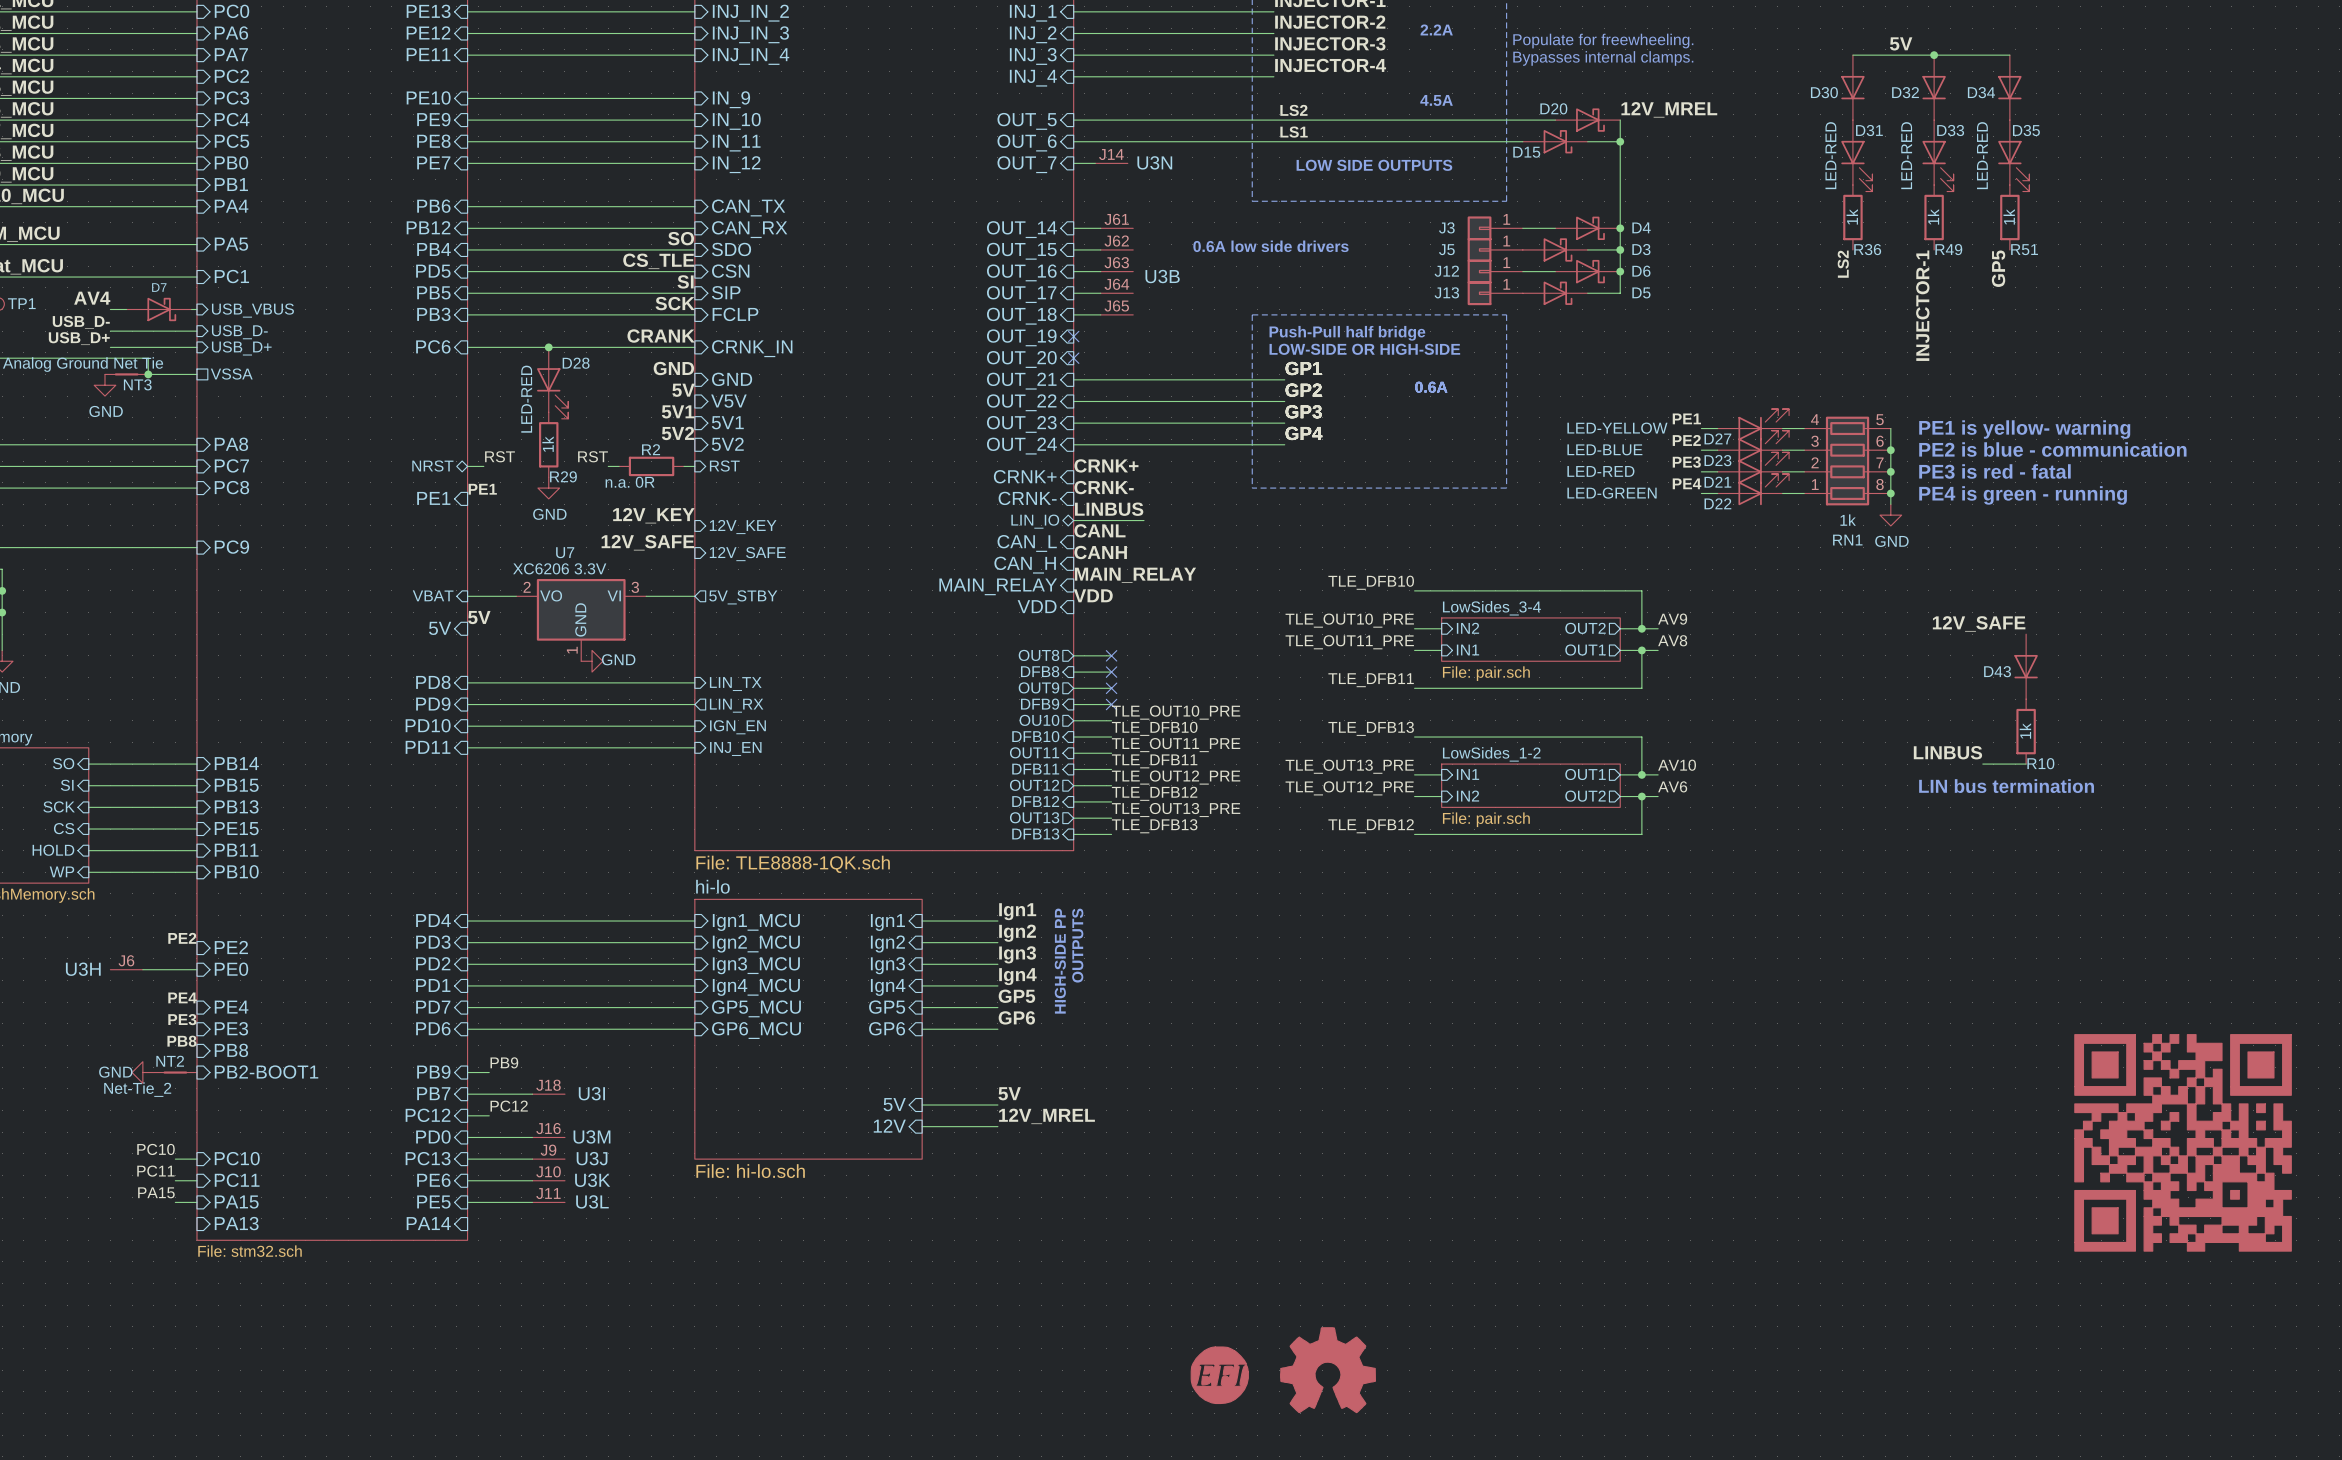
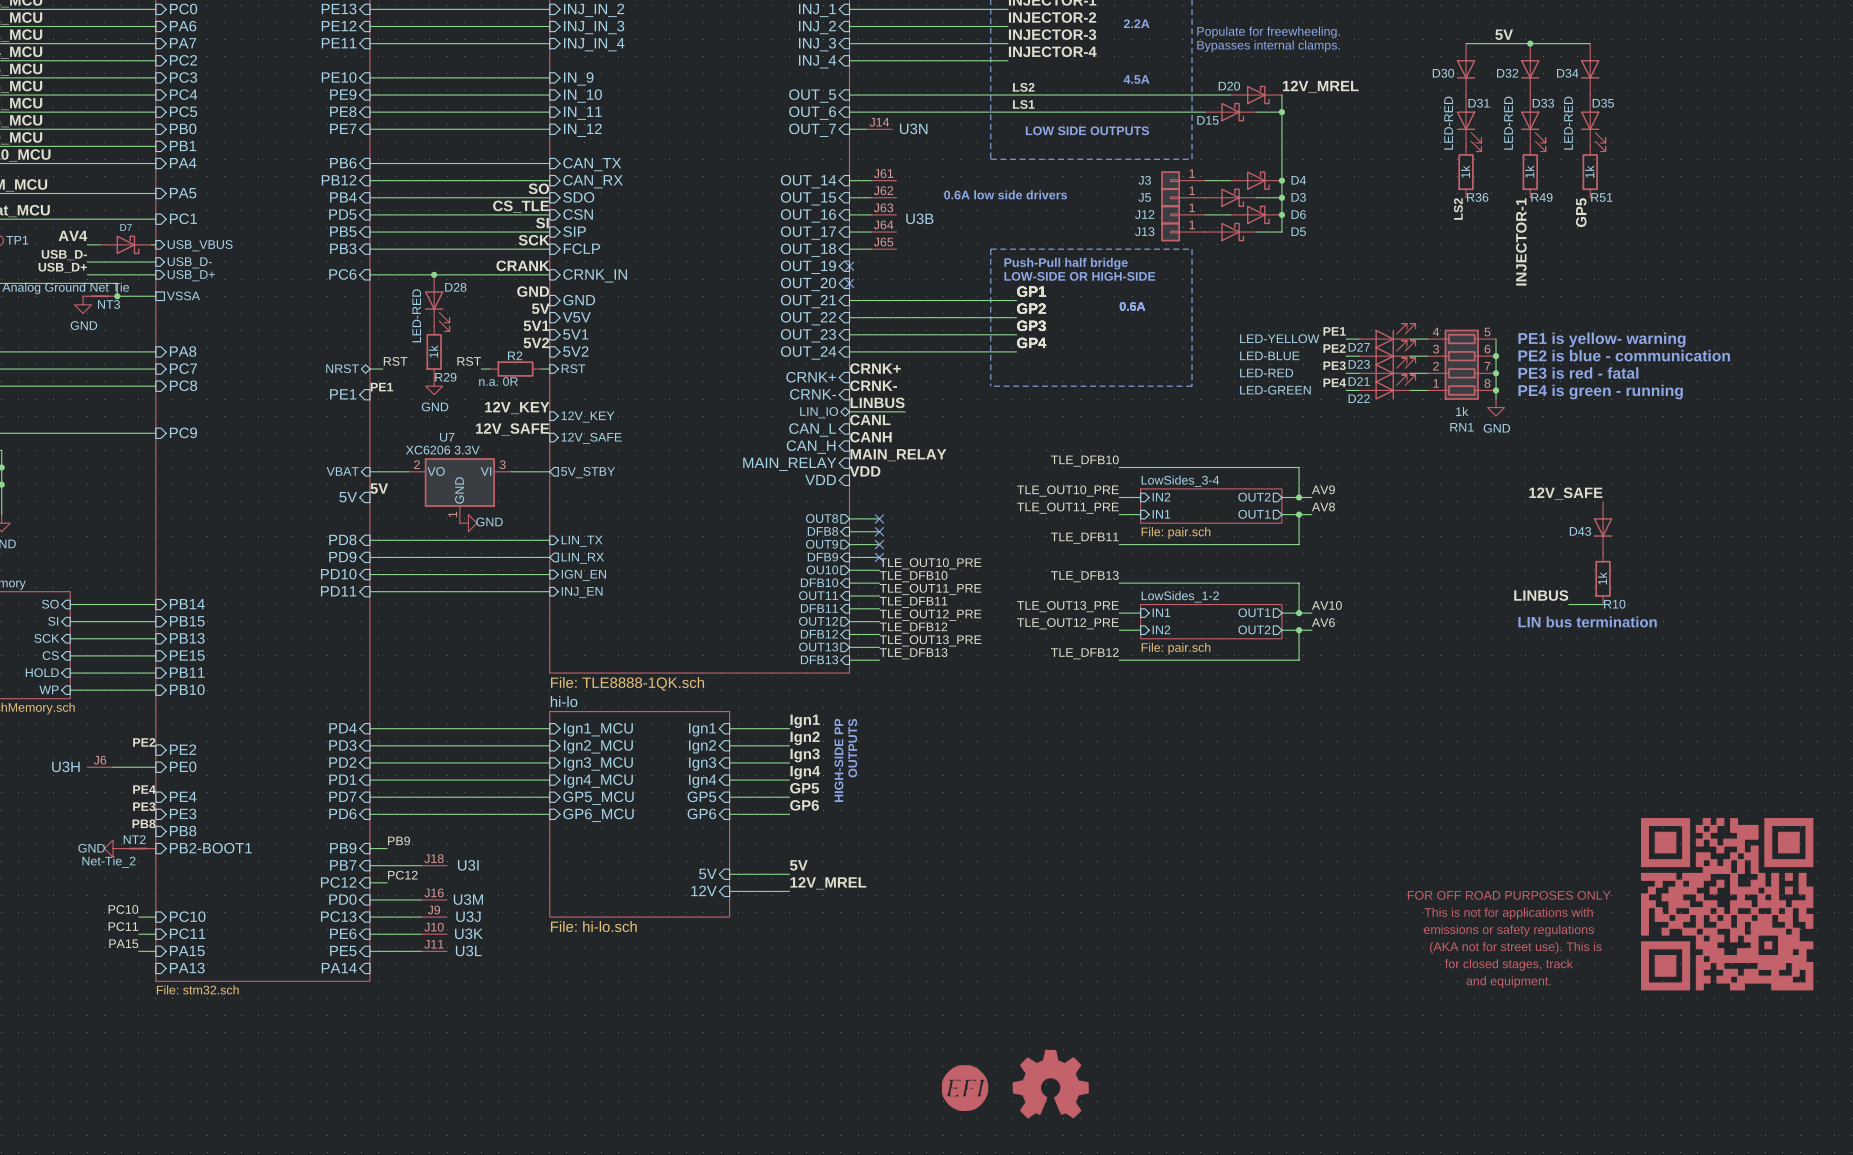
part: none -> (1509, 939)

